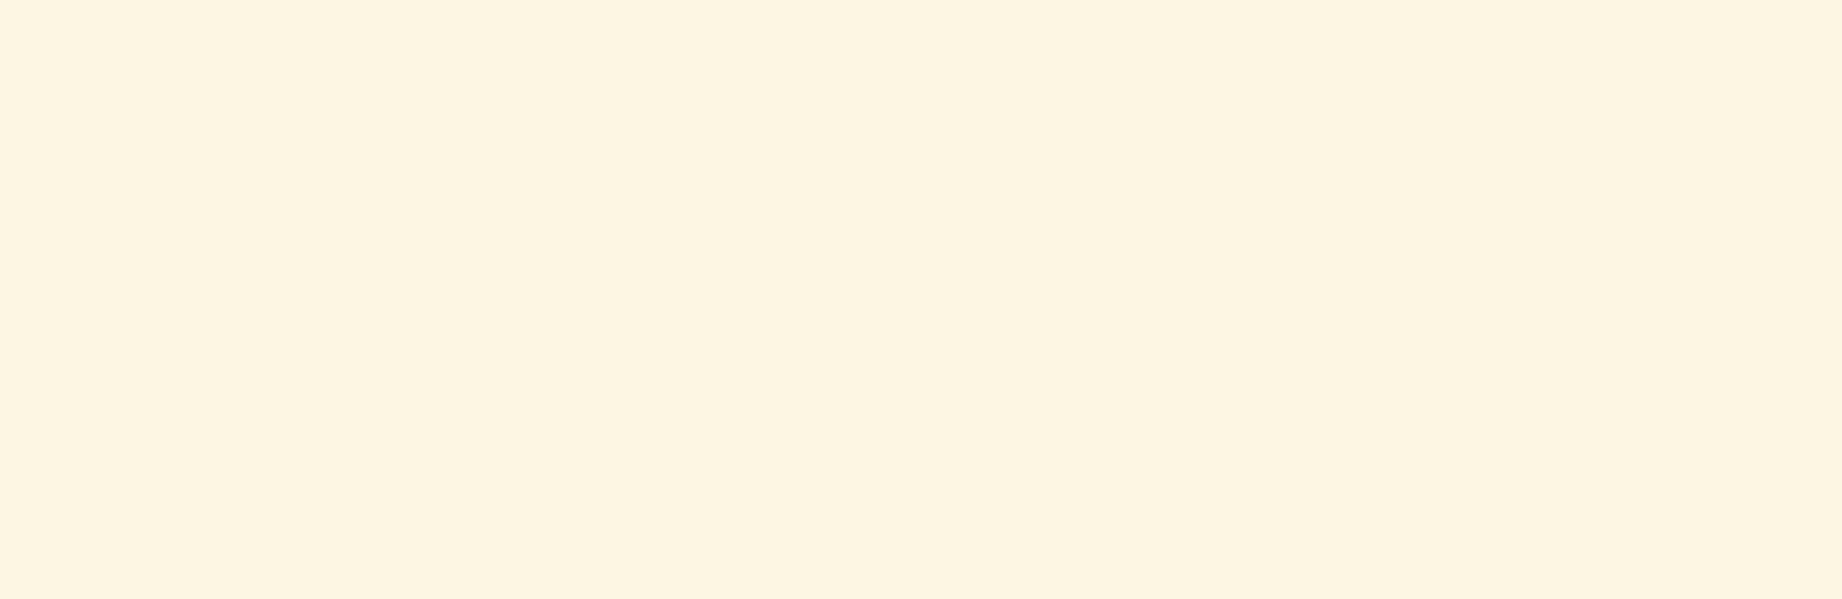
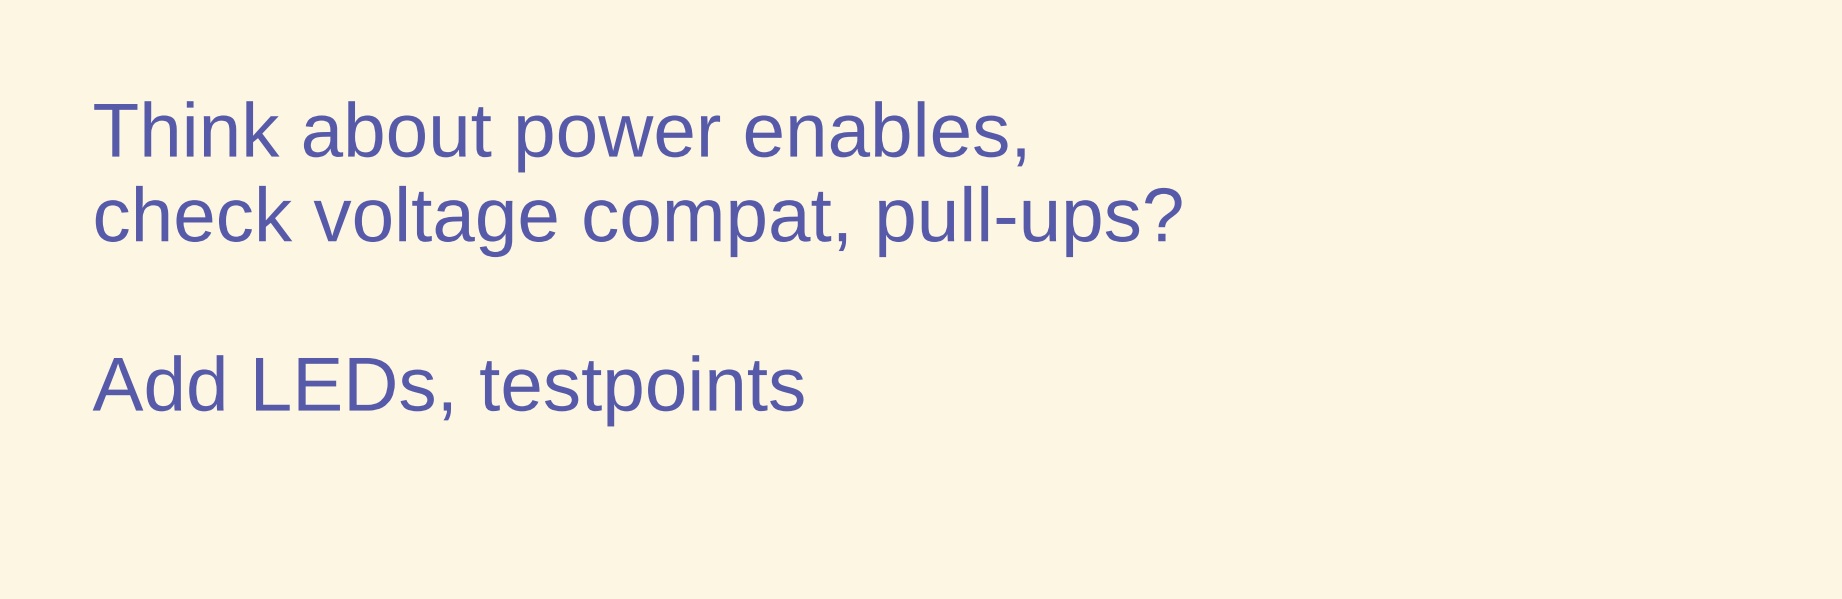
text: none -> Think about power enables, (559, 136)
text: none -> check voltage compat, pull-ups? (638, 221)
text: none -> Add LEDs, testpoints (448, 390)

